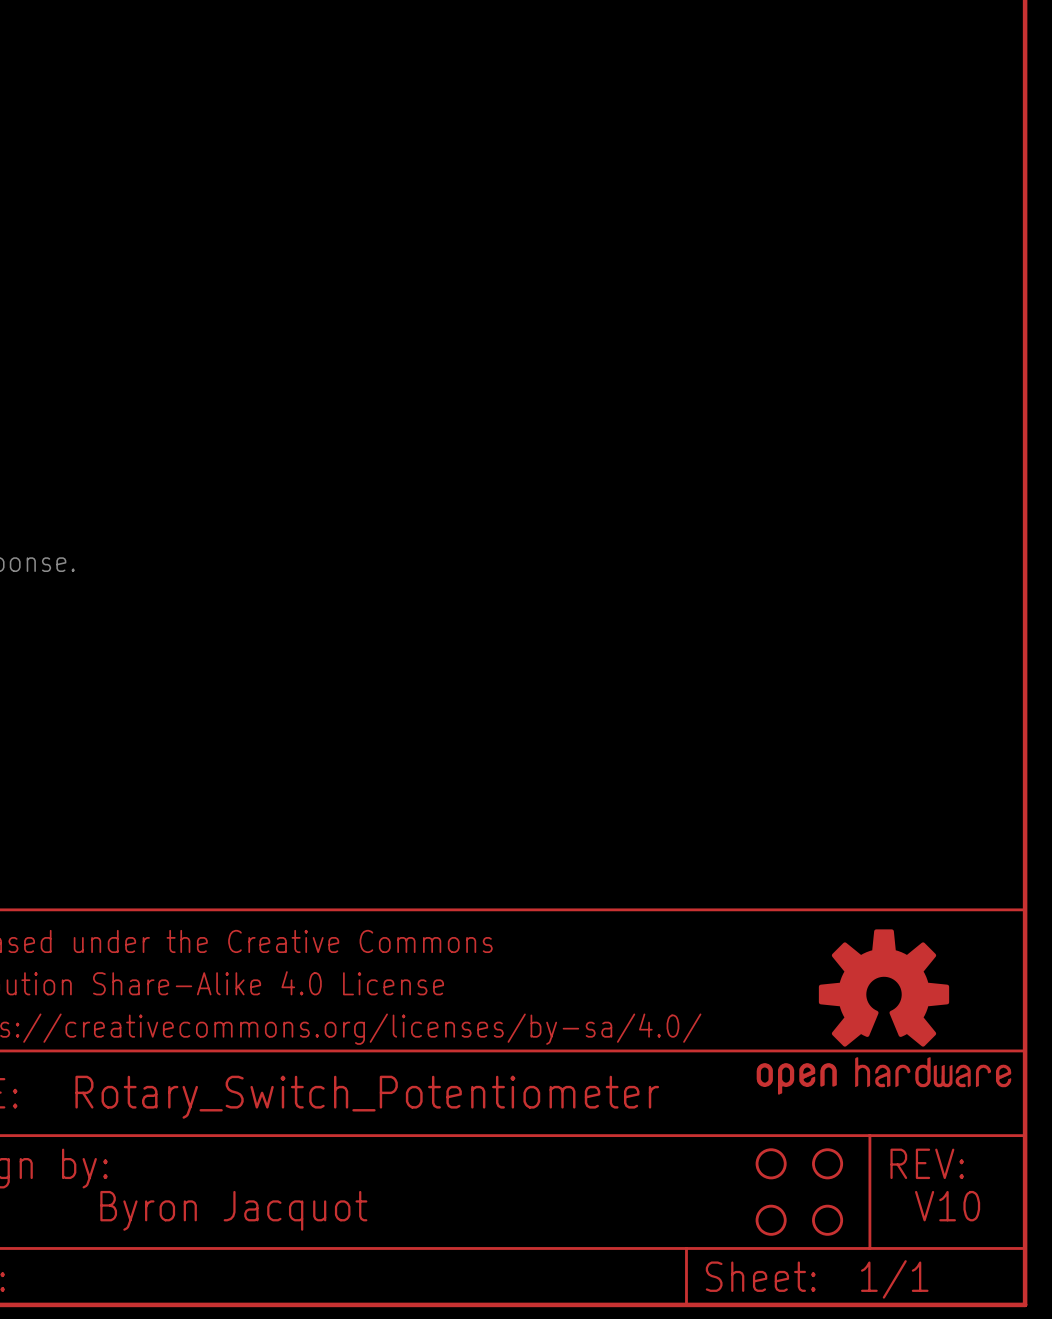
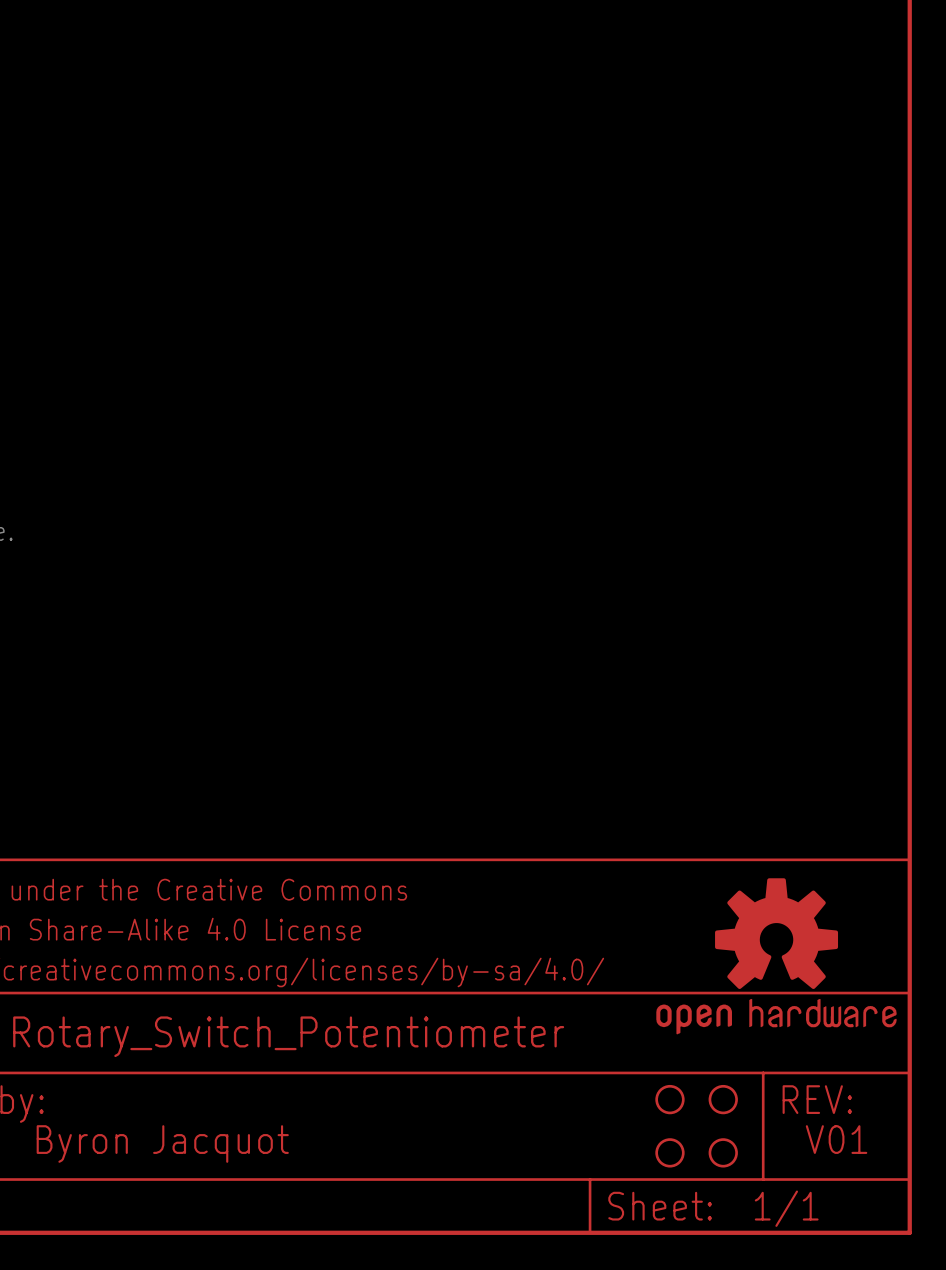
text: V10 (947, 1206) -> V01 (836, 1139)

